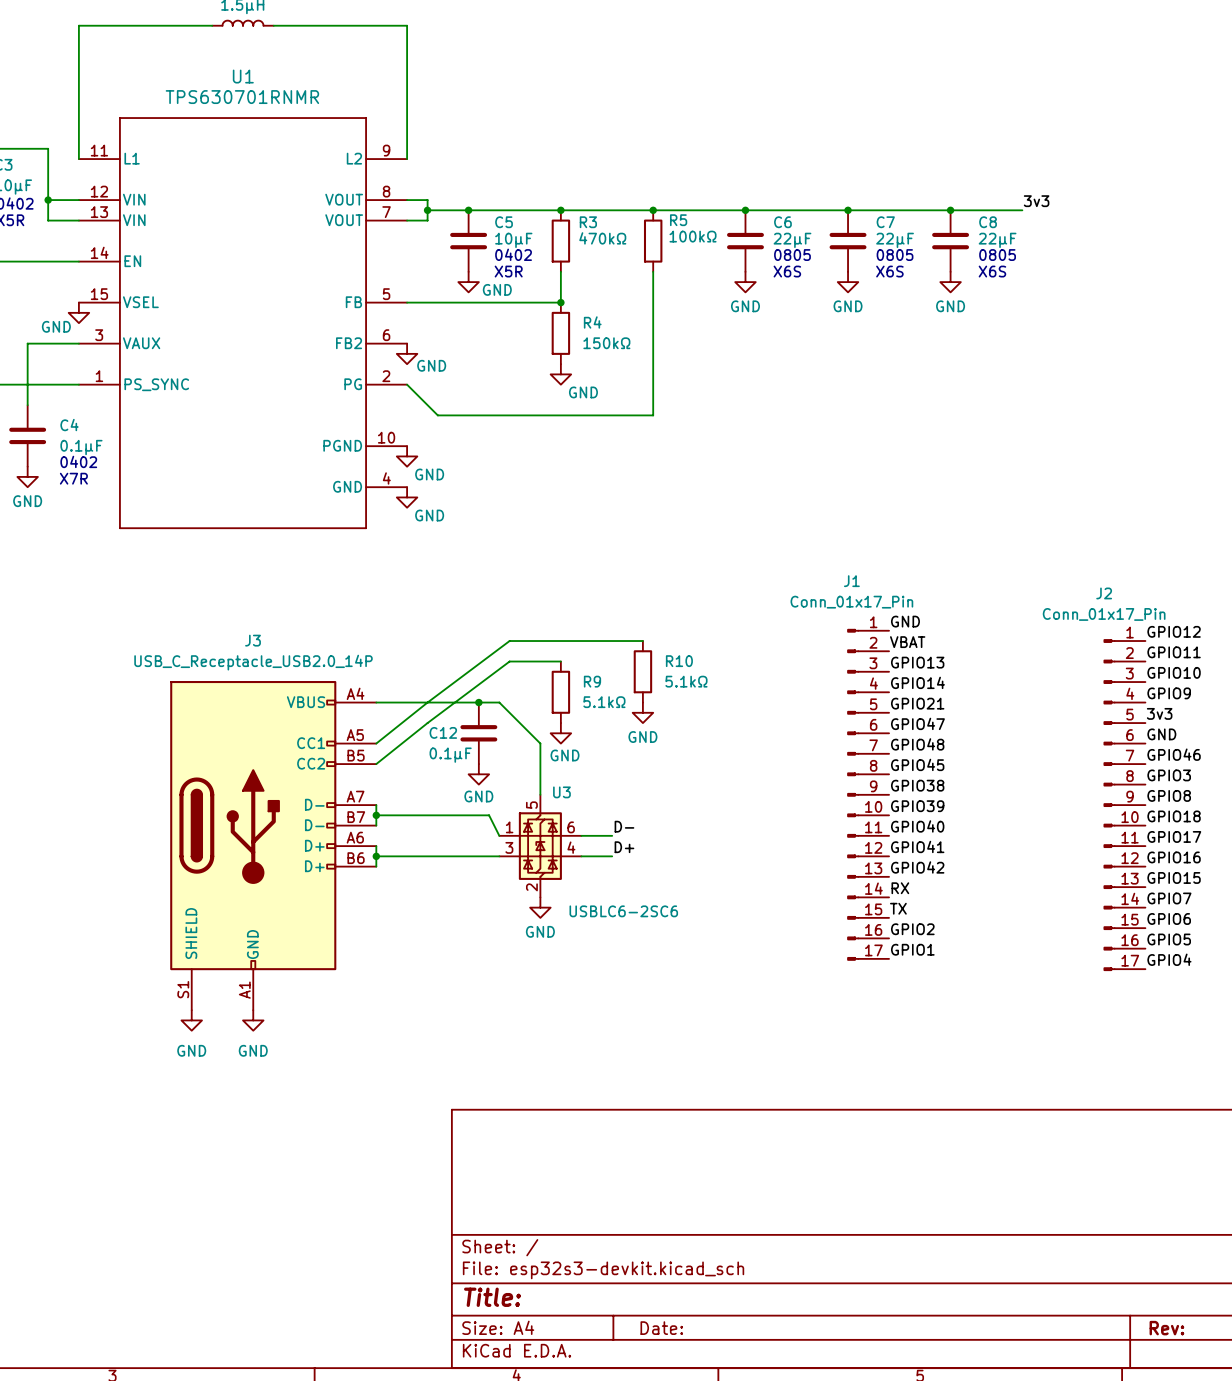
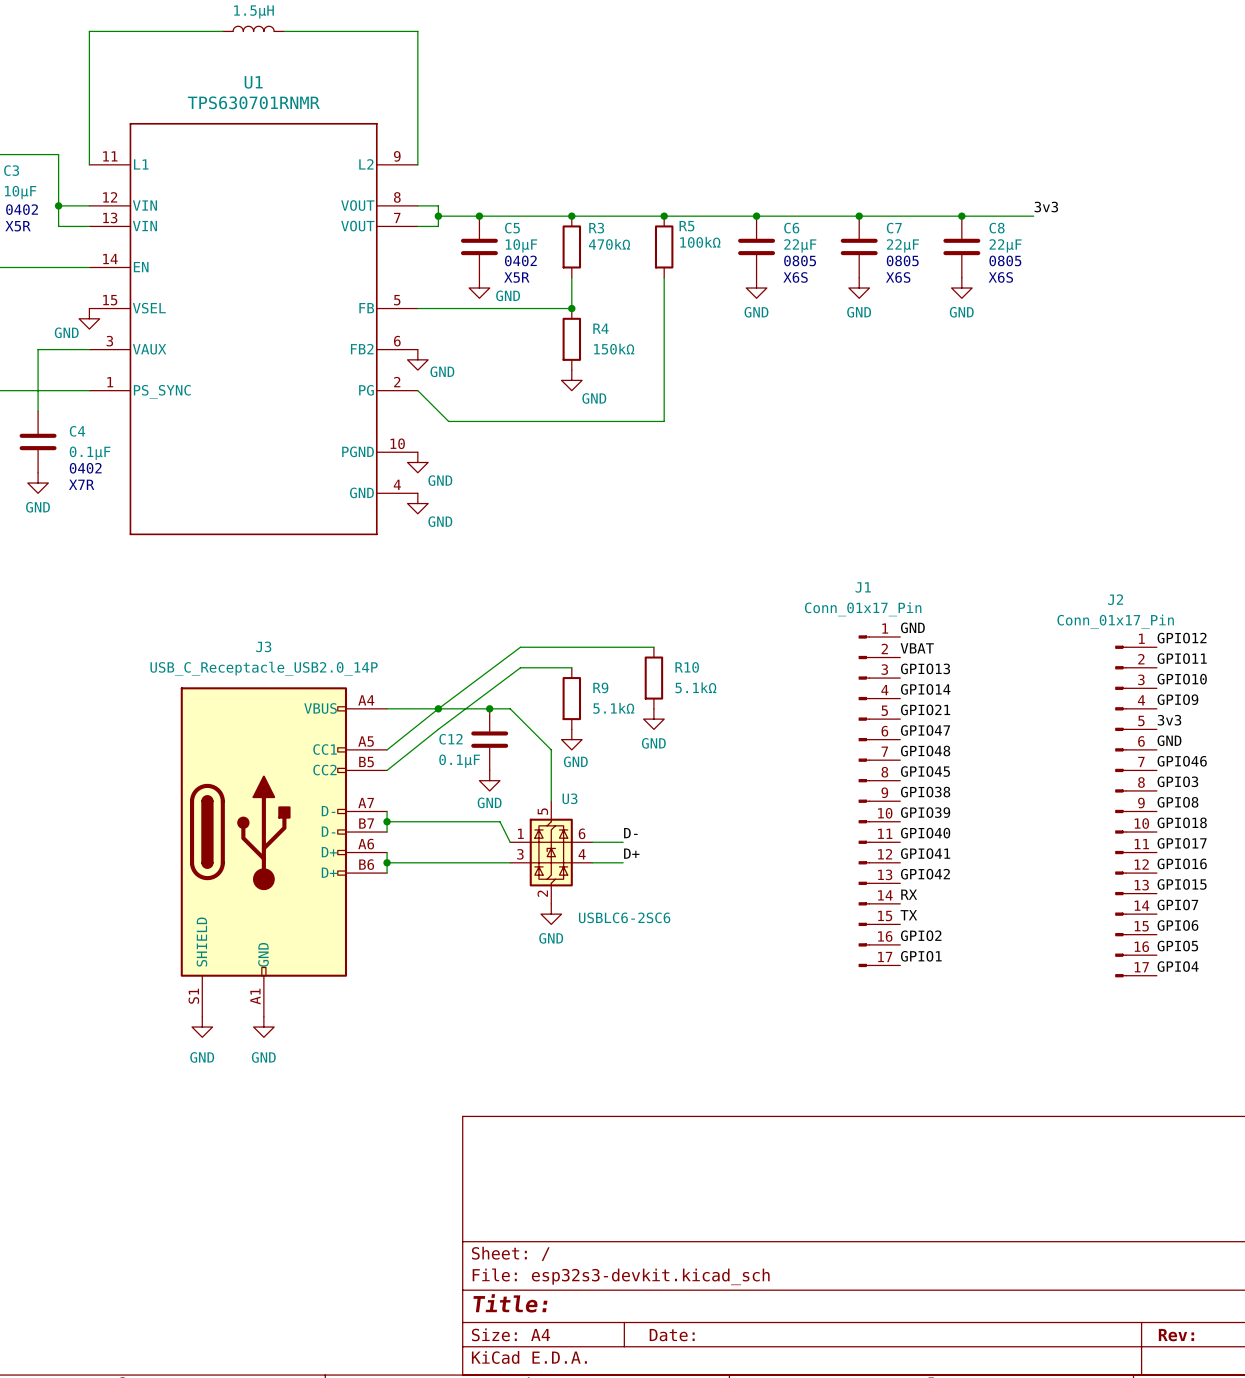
junction: none -> (438, 708)

